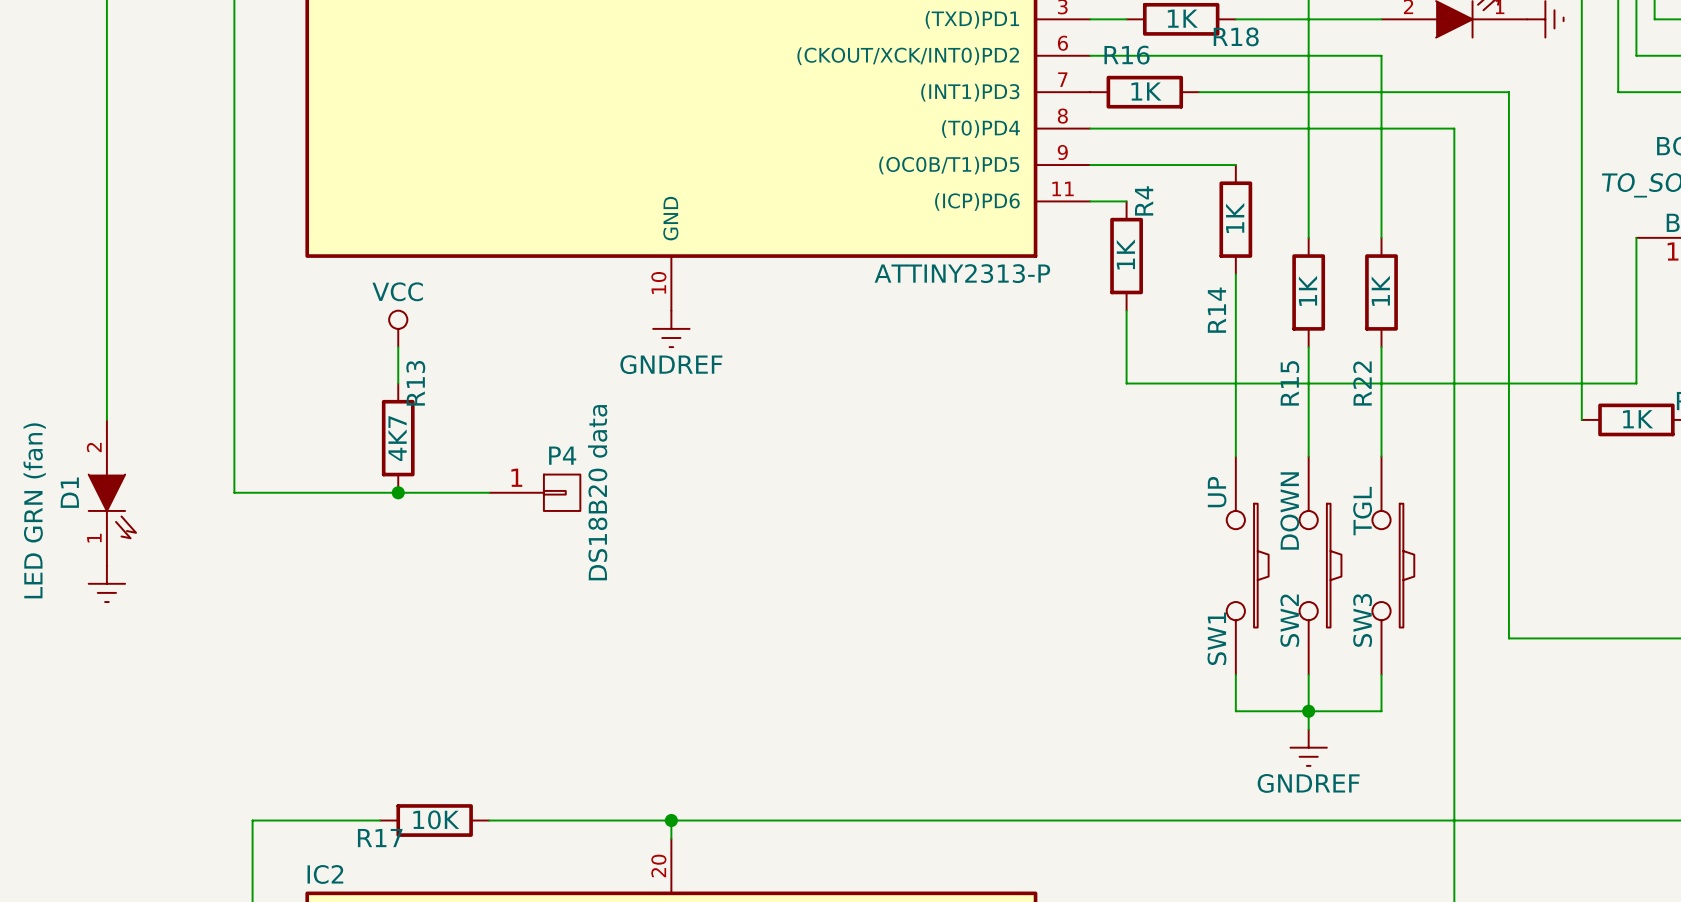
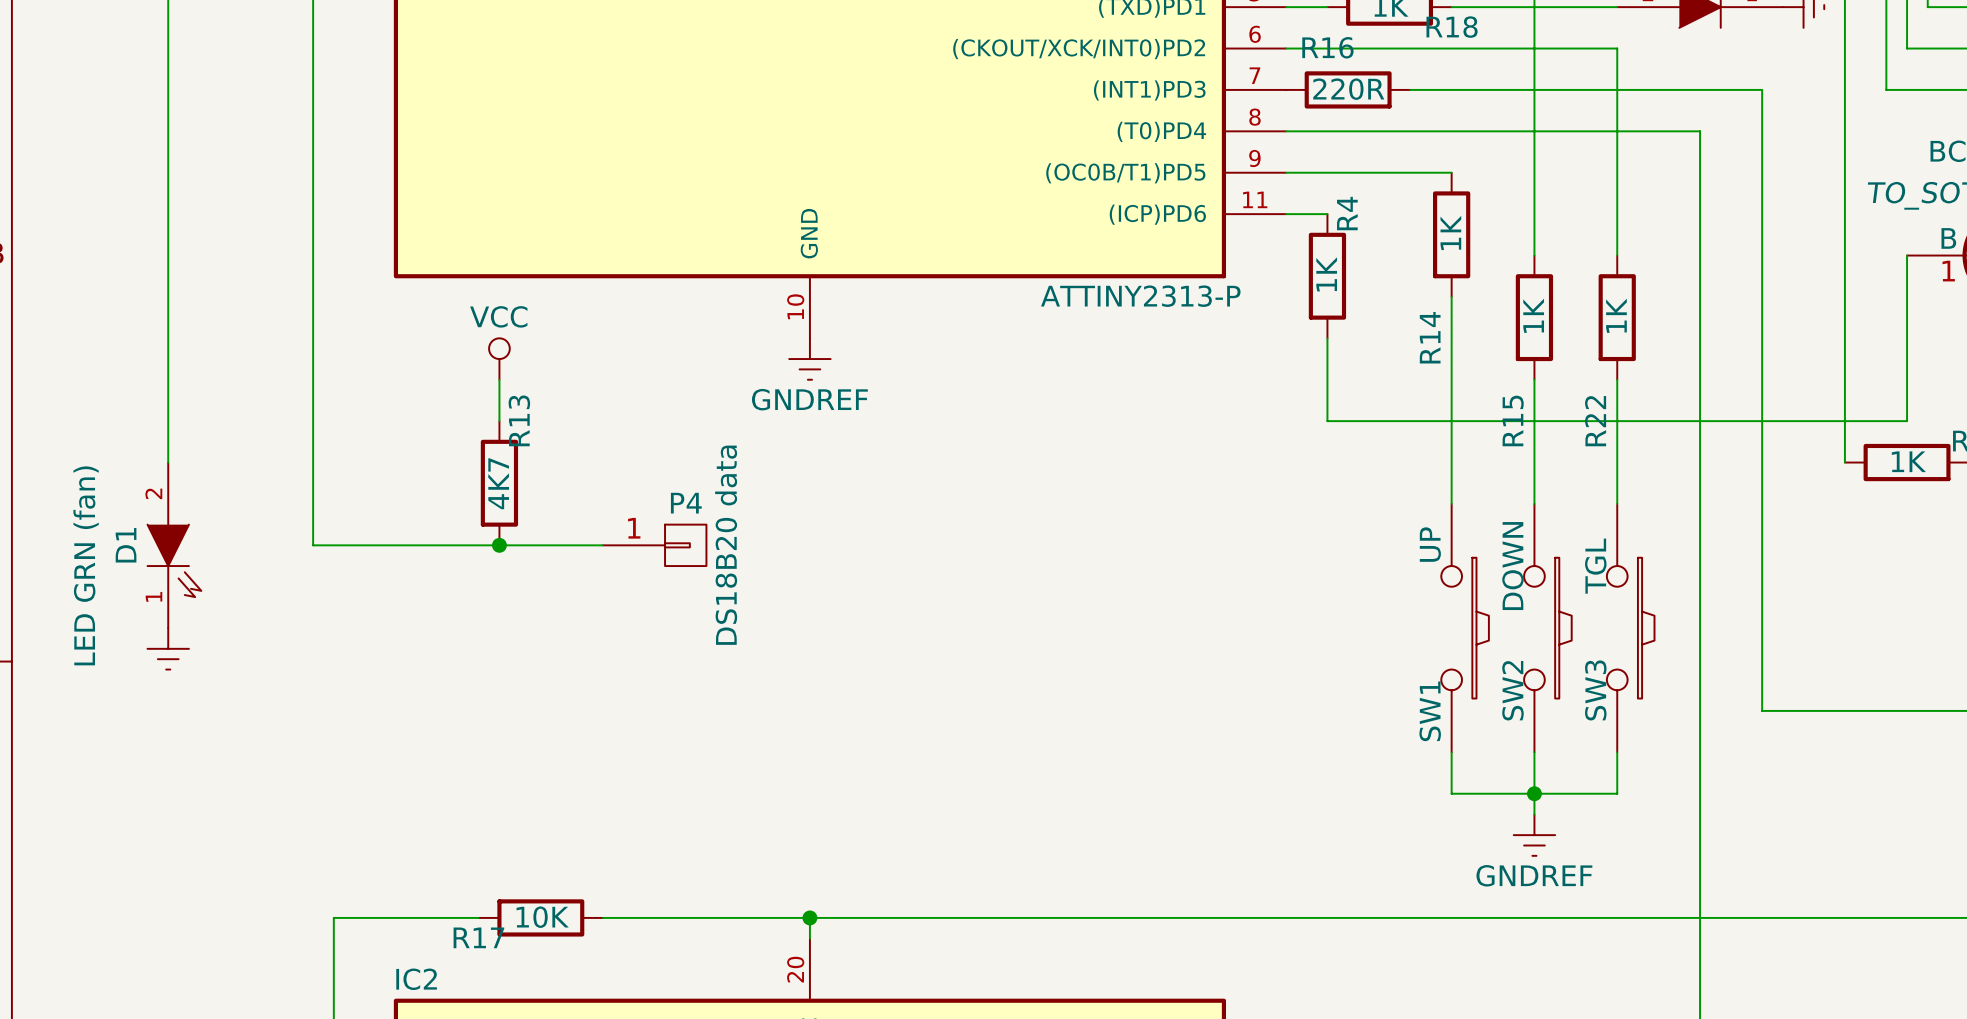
R16 value: 1K (1146, 91) -> 220R (1348, 89)

